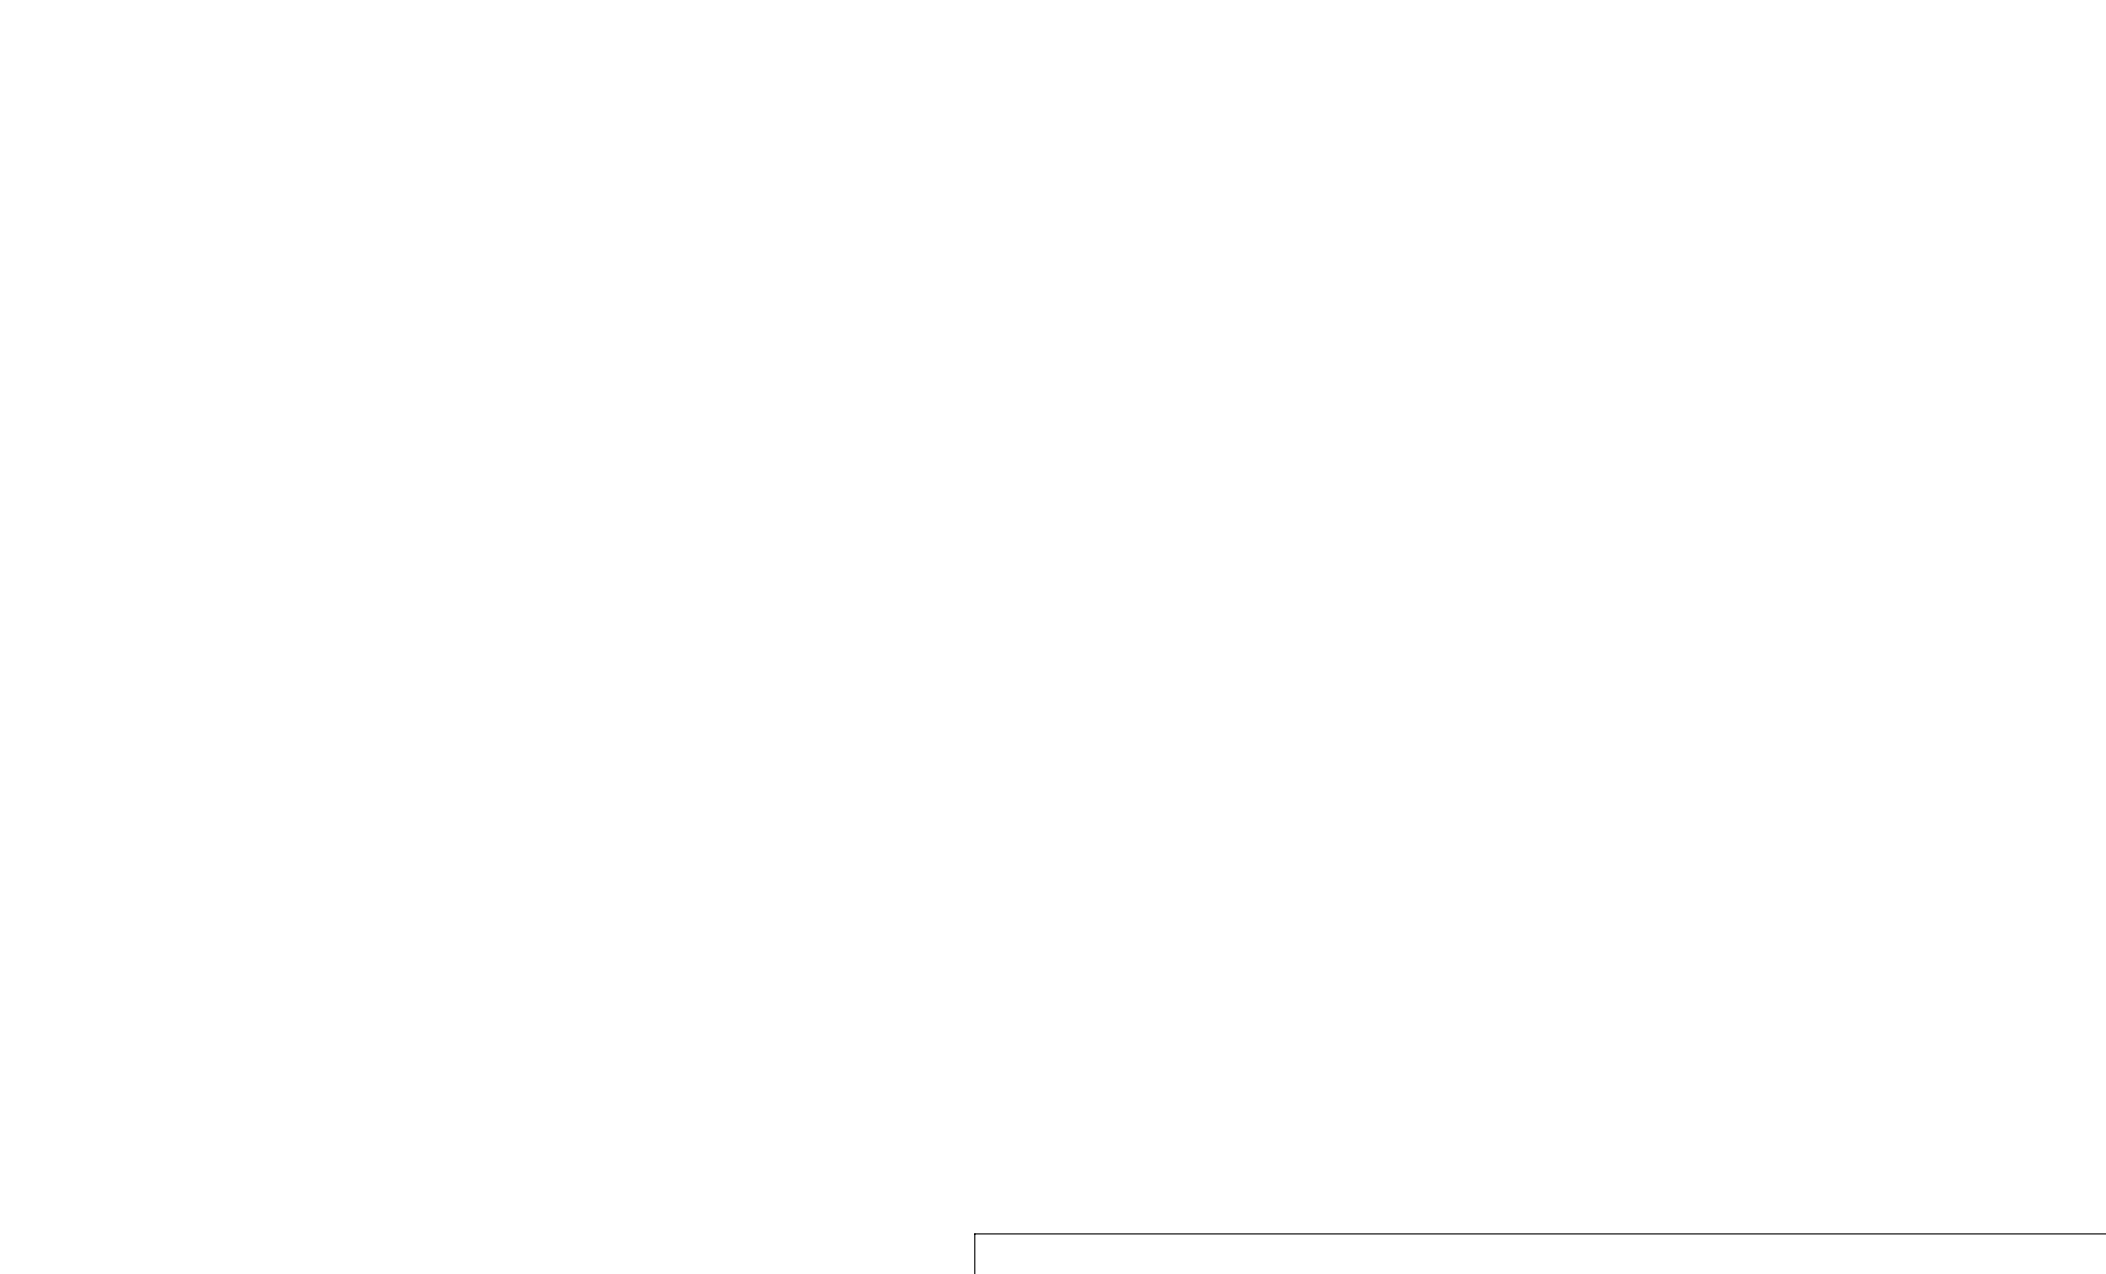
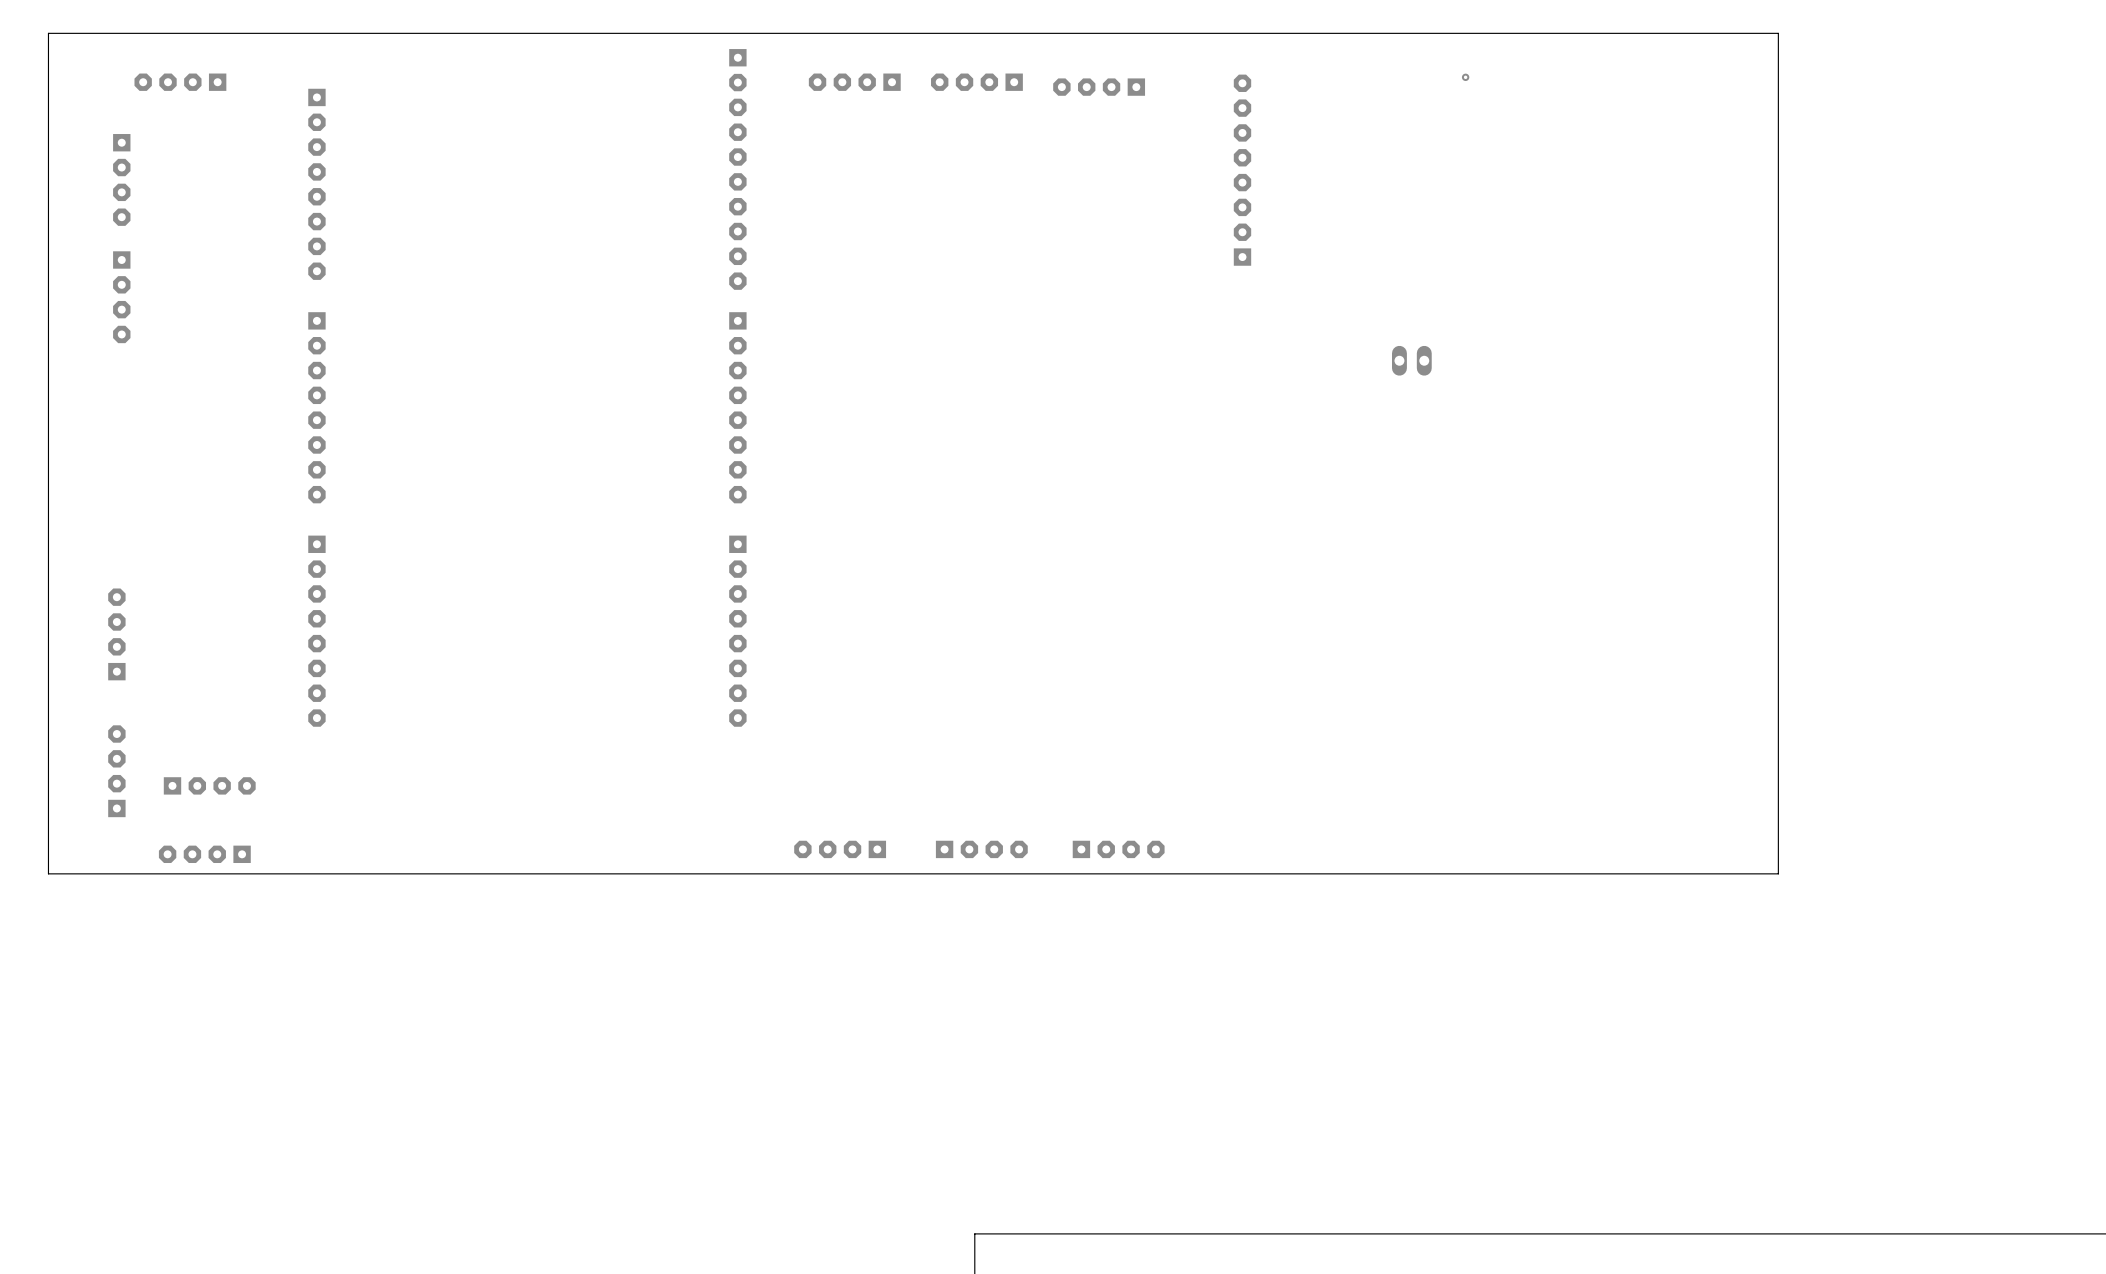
board edge: none -> (1778, 33) (48, 33) (48, 873) (1778, 873) (1778, 33)
via: none -> (1465, 77)
part: none -> (180, 82)
part: none -> (854, 82)
part: none -> (976, 82)
part: none -> (1099, 87)
part: none -> (737, 169)
part: none -> (1242, 170)
part: none -> (121, 179)
part: none -> (316, 184)
part: none -> (121, 297)
part: none -> (1411, 360)
part: none -> (316, 407)
part: none -> (737, 407)
part: none -> (316, 631)
part: none -> (737, 631)
part: none -> (116, 634)
part: none -> (116, 771)
part: none -> (209, 785)
part: none -> (840, 849)
part: none -> (981, 849)
part: none -> (1118, 849)
part: none -> (204, 854)

